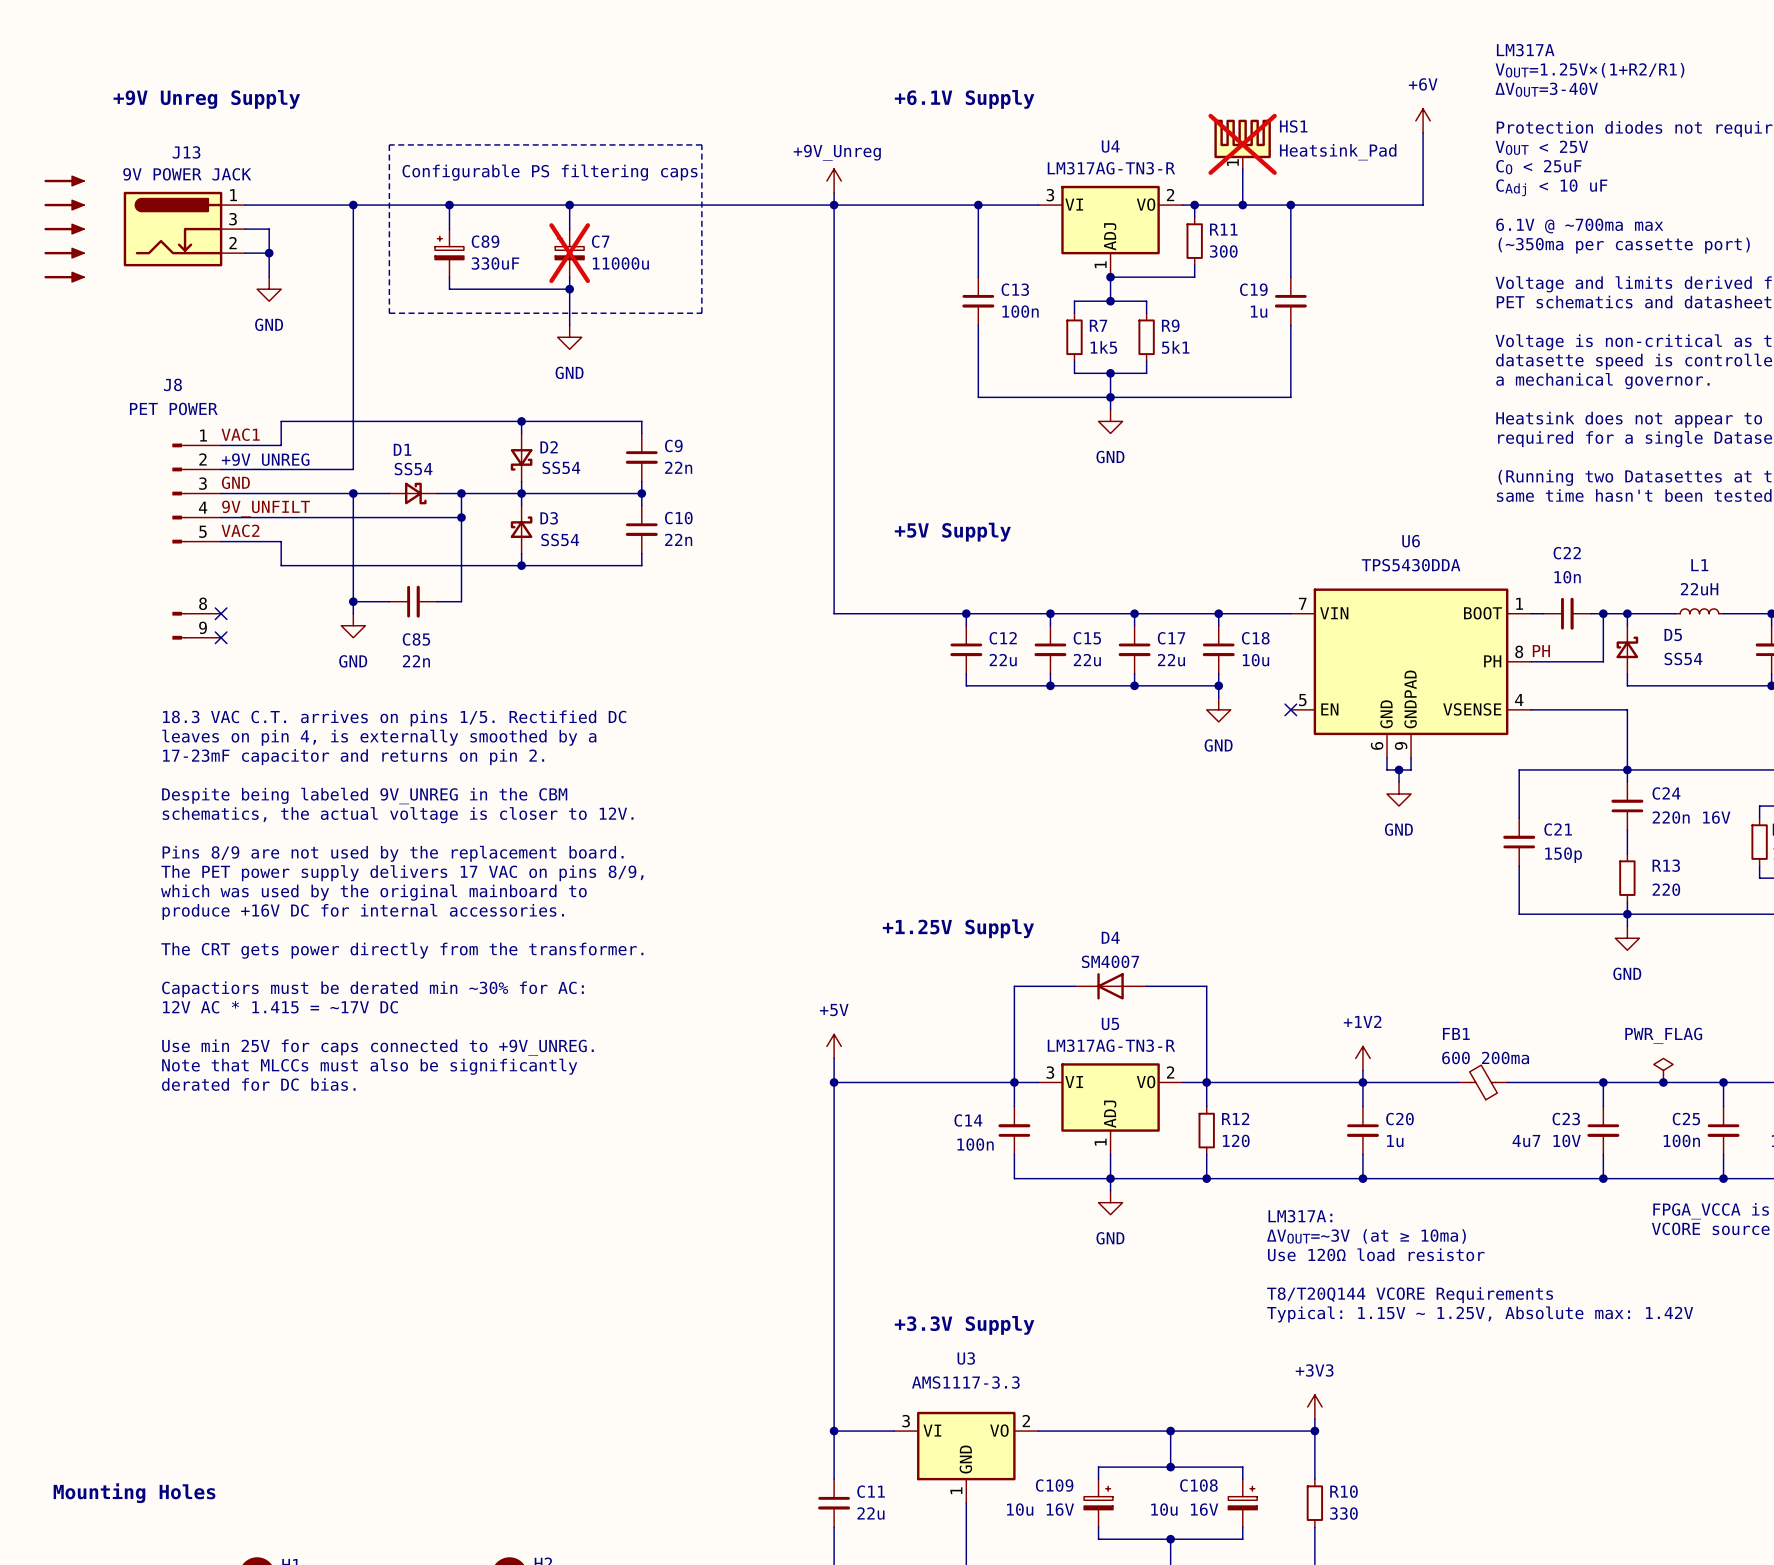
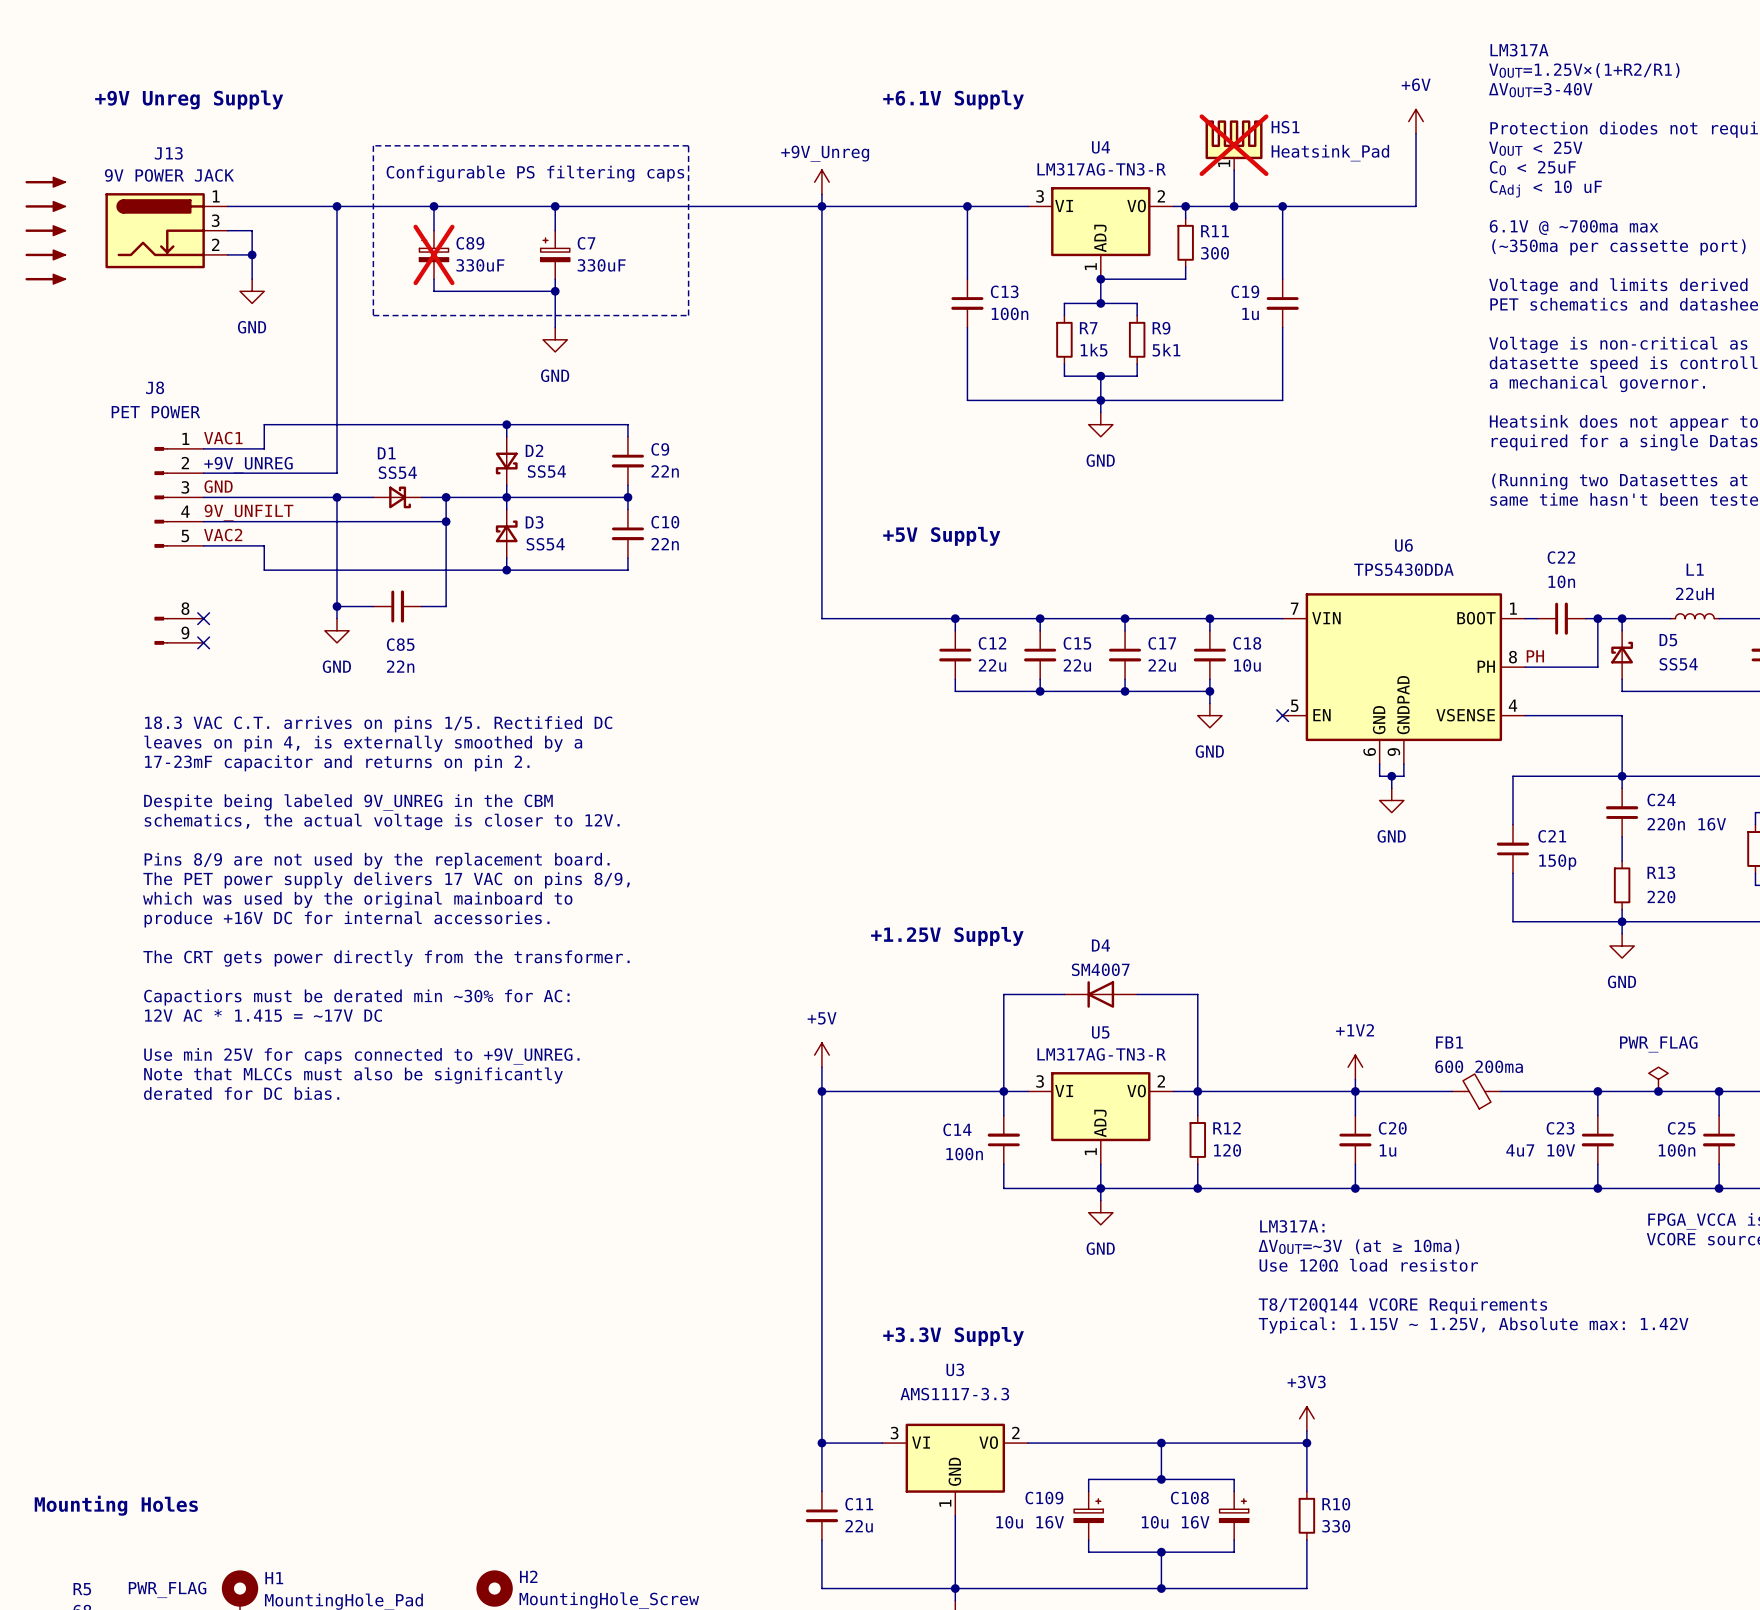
C89 do-not-place cross: none -> (433, 254)
C7 do-not-place cross: (569, 253) -> none
C7 value: 11000u (620, 263) -> 330uF (601, 265)

